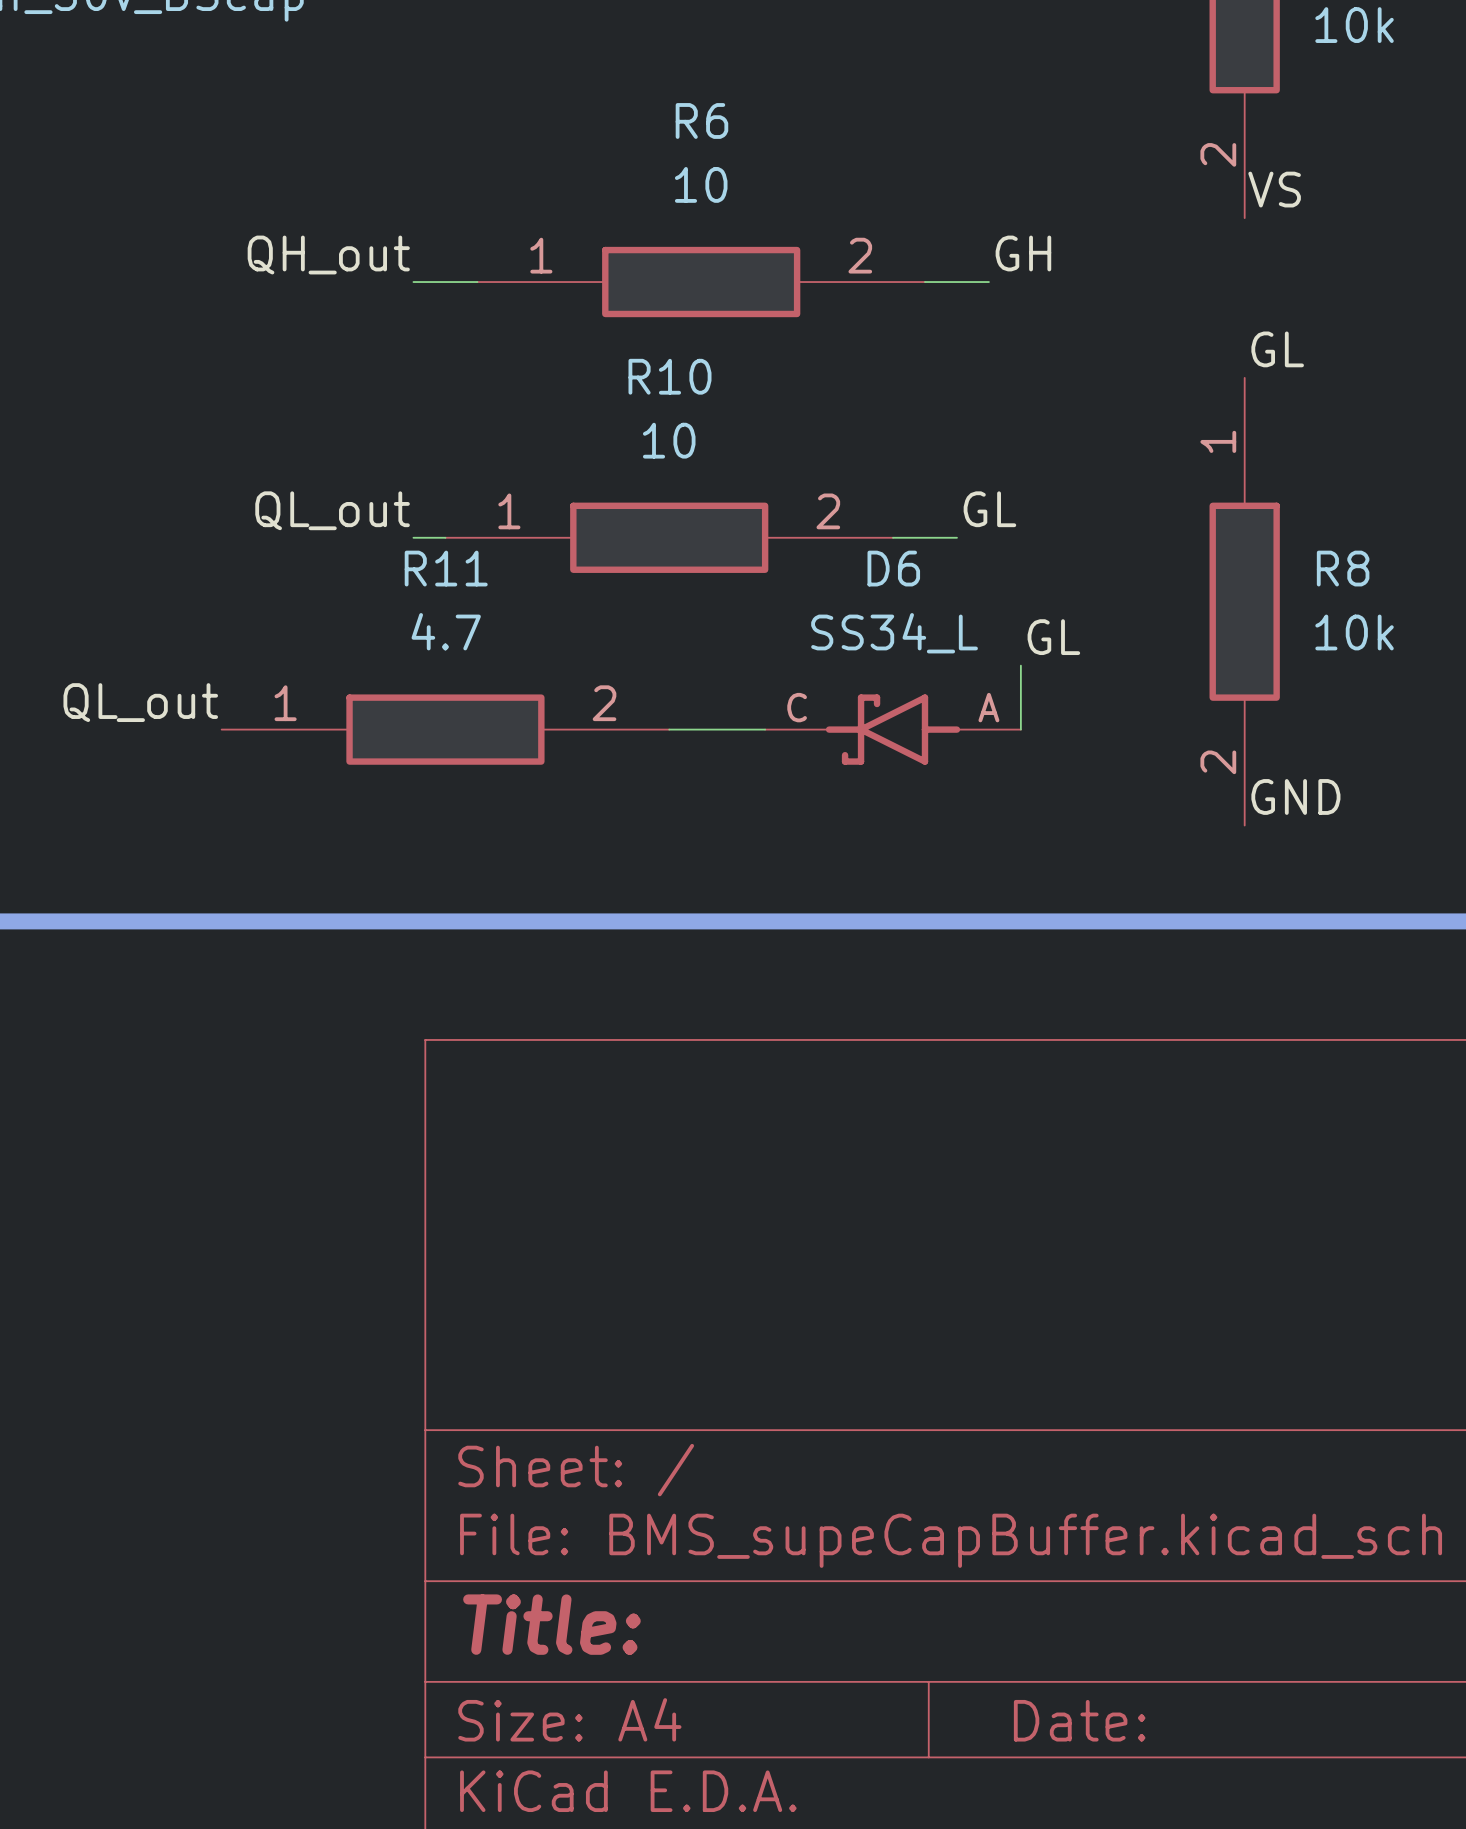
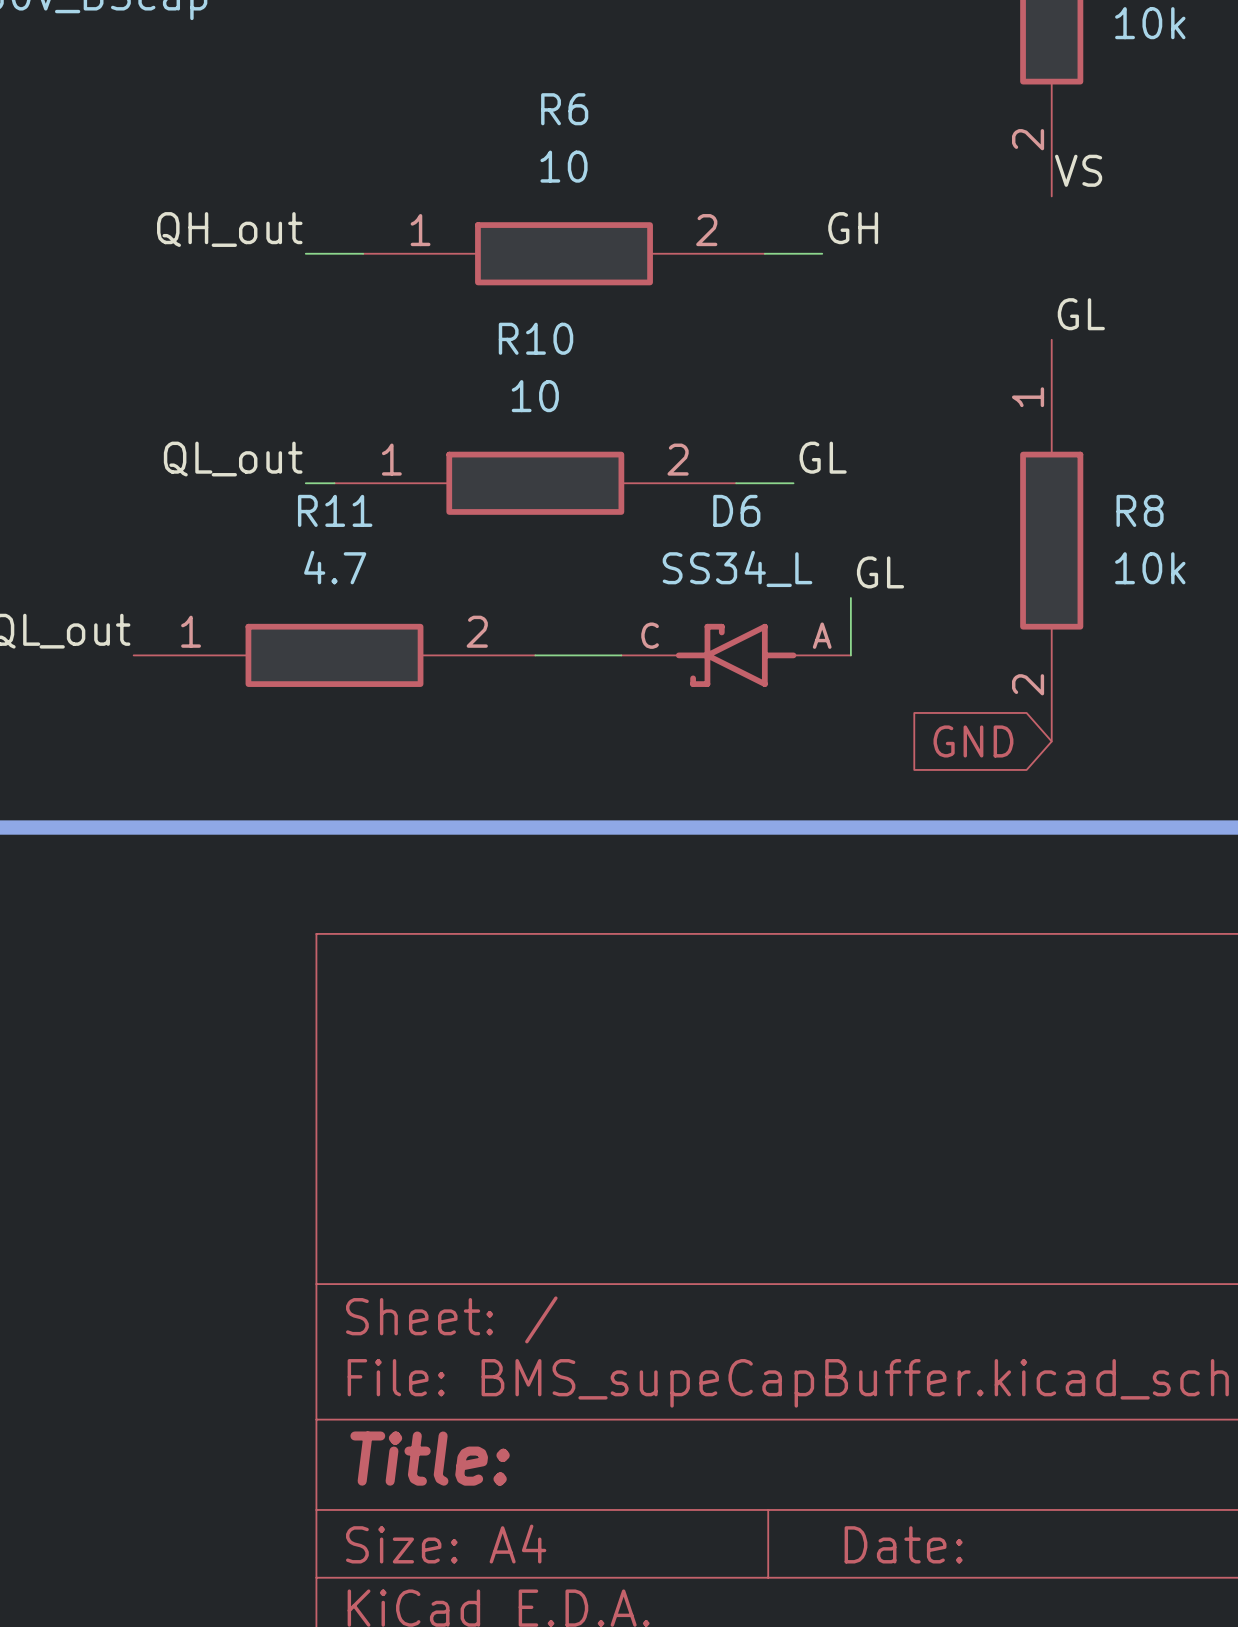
label: GND (1295, 796) -> none
global label: none -> GND (973, 741)

